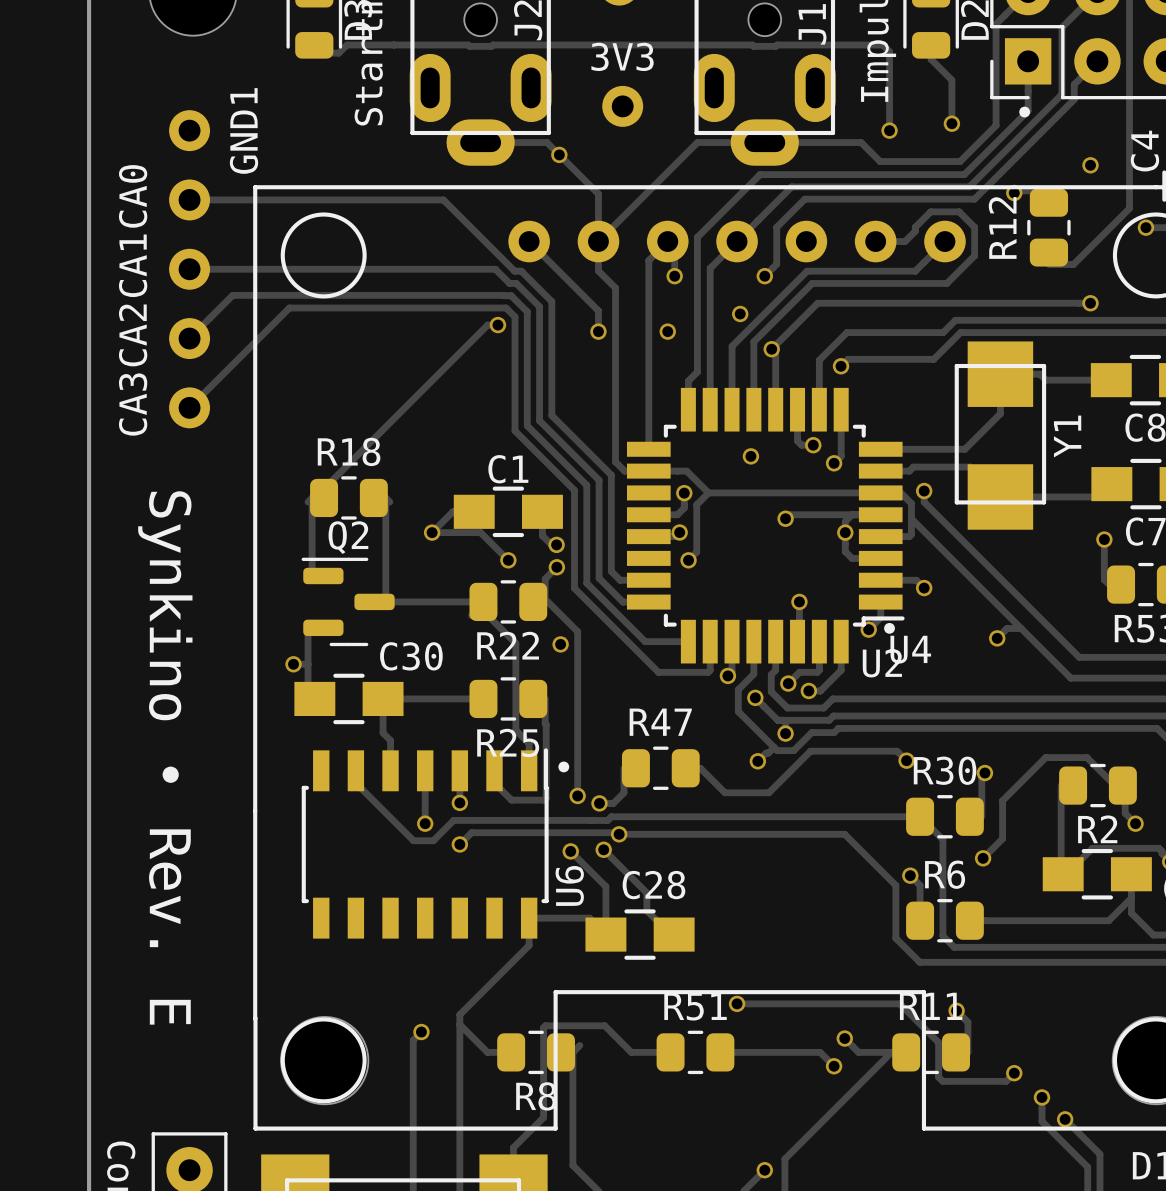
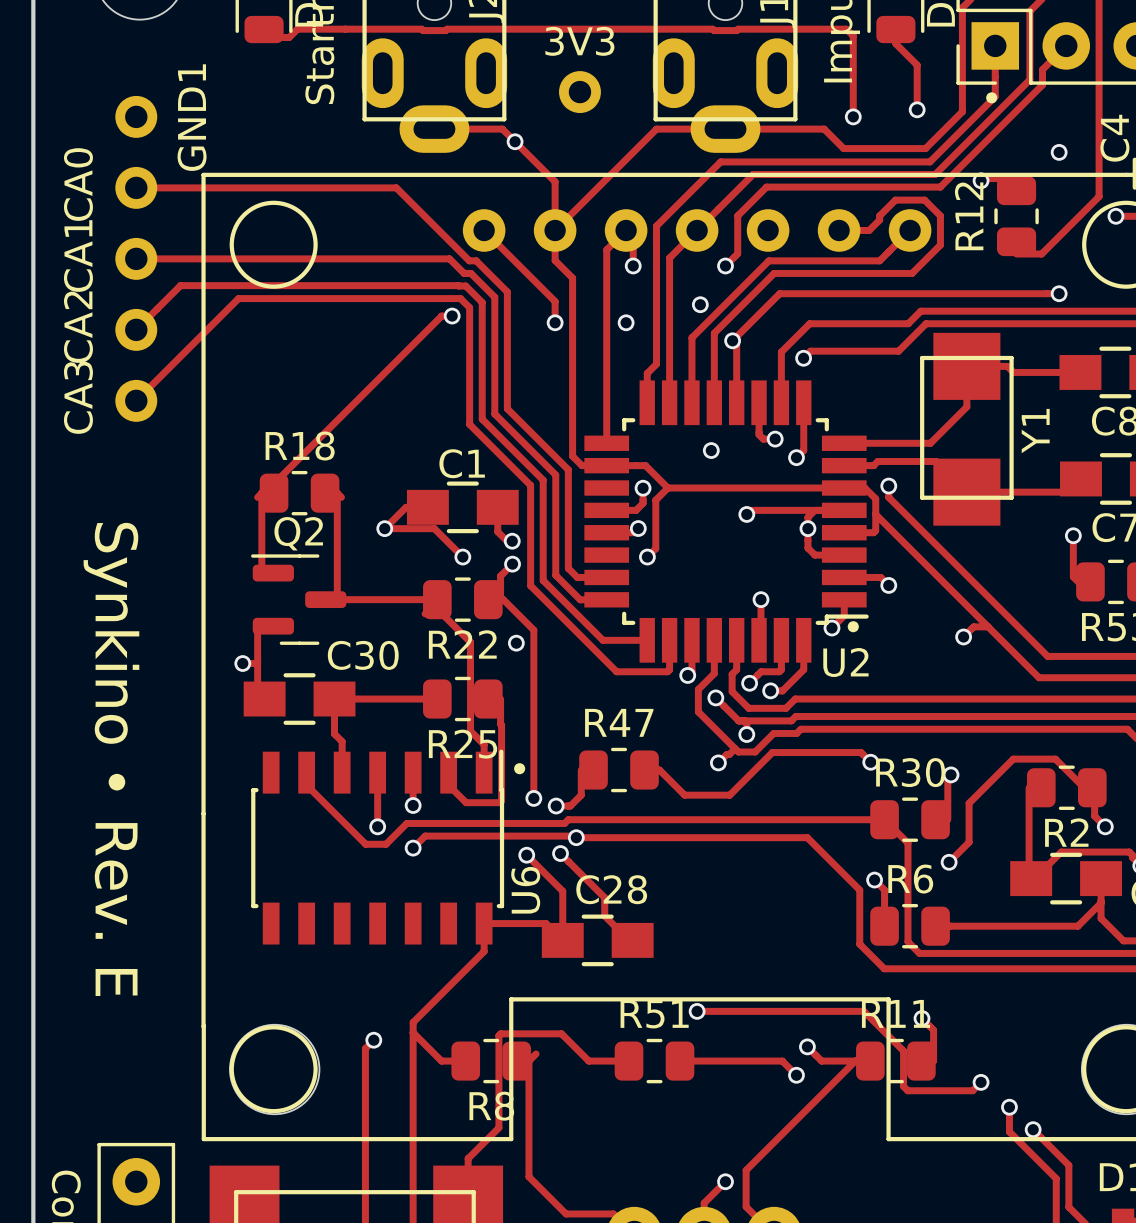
U4 name: U4 (910, 649) -> none

